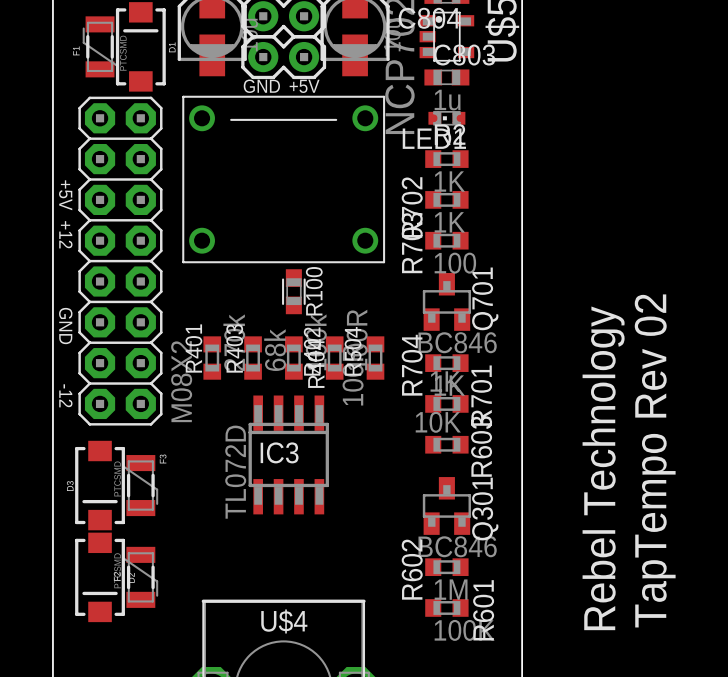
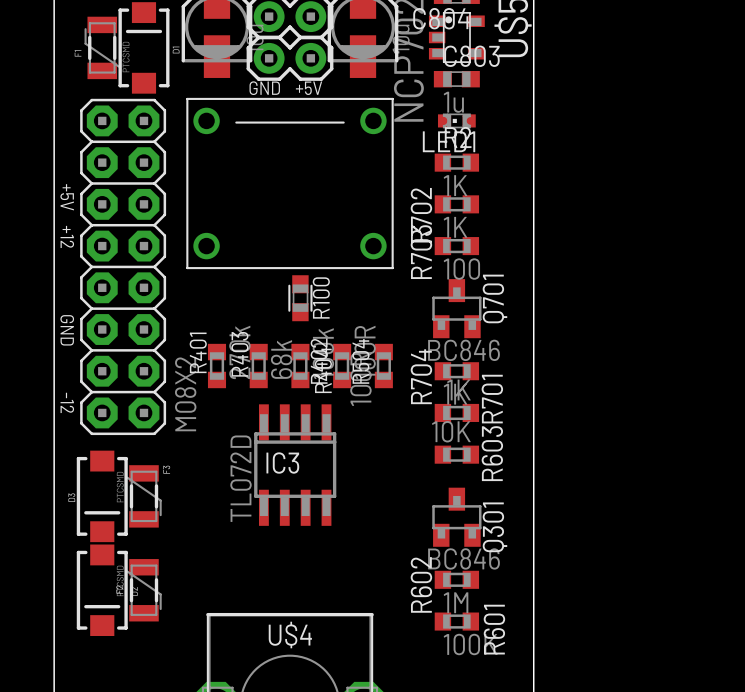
text: TapTempo Rev 02 (655, 460) -> none
text: Rebel Technology (603, 468) -> none

